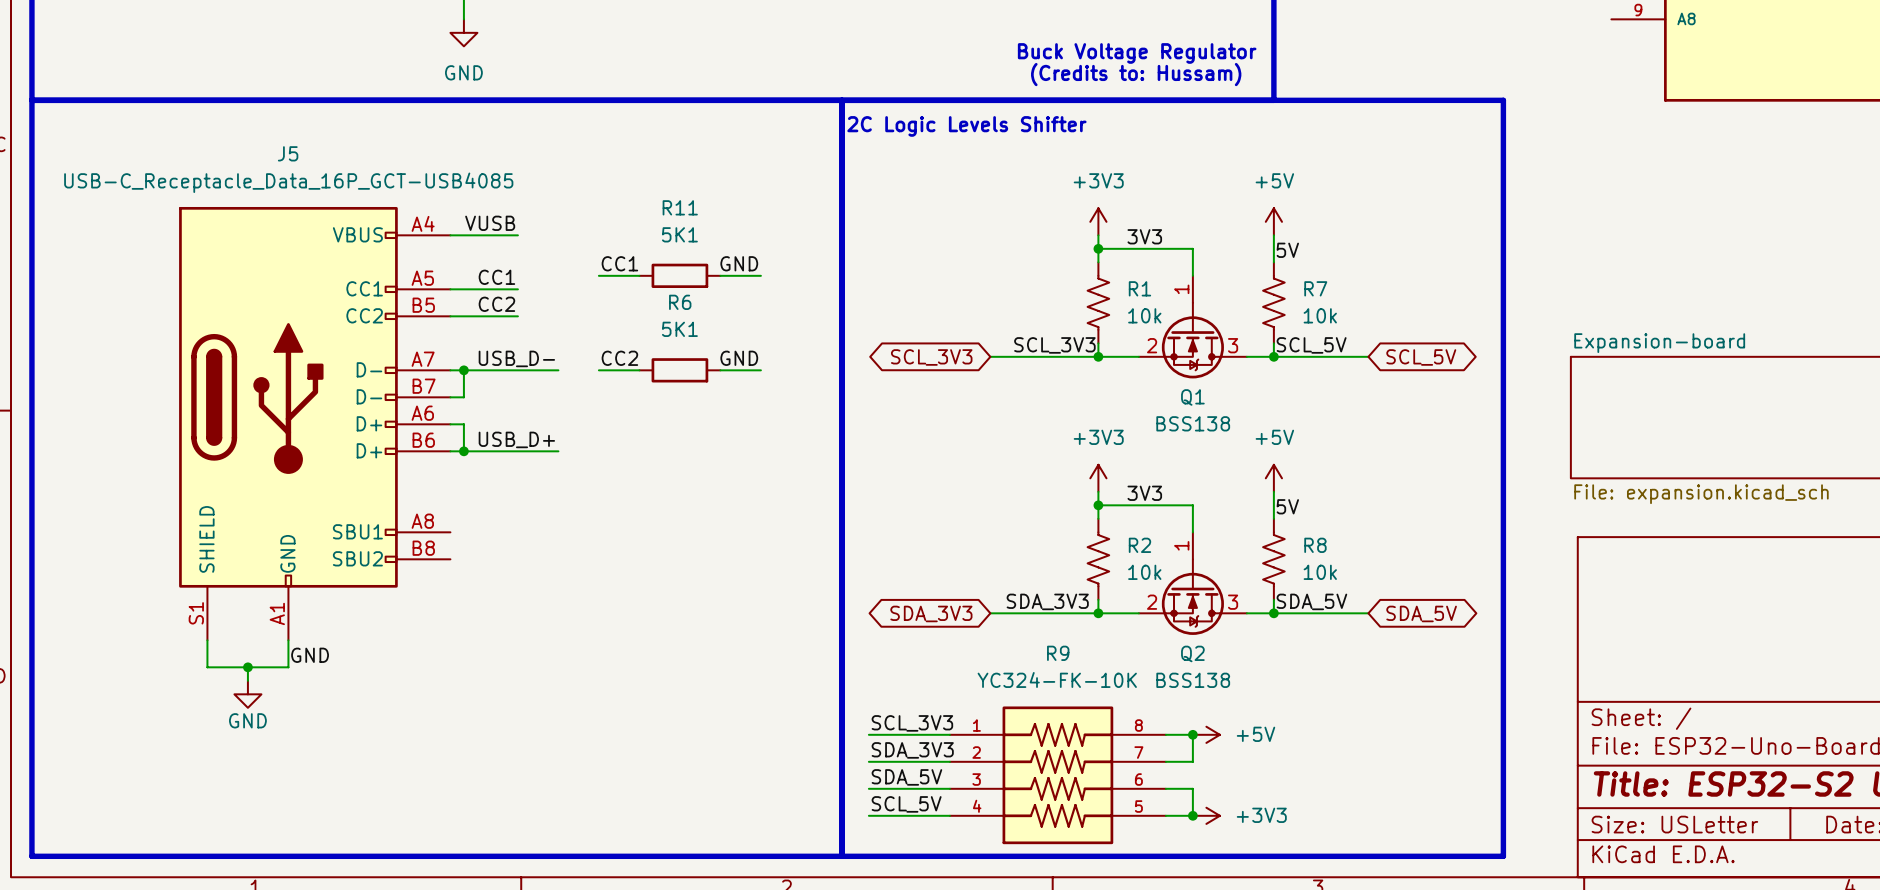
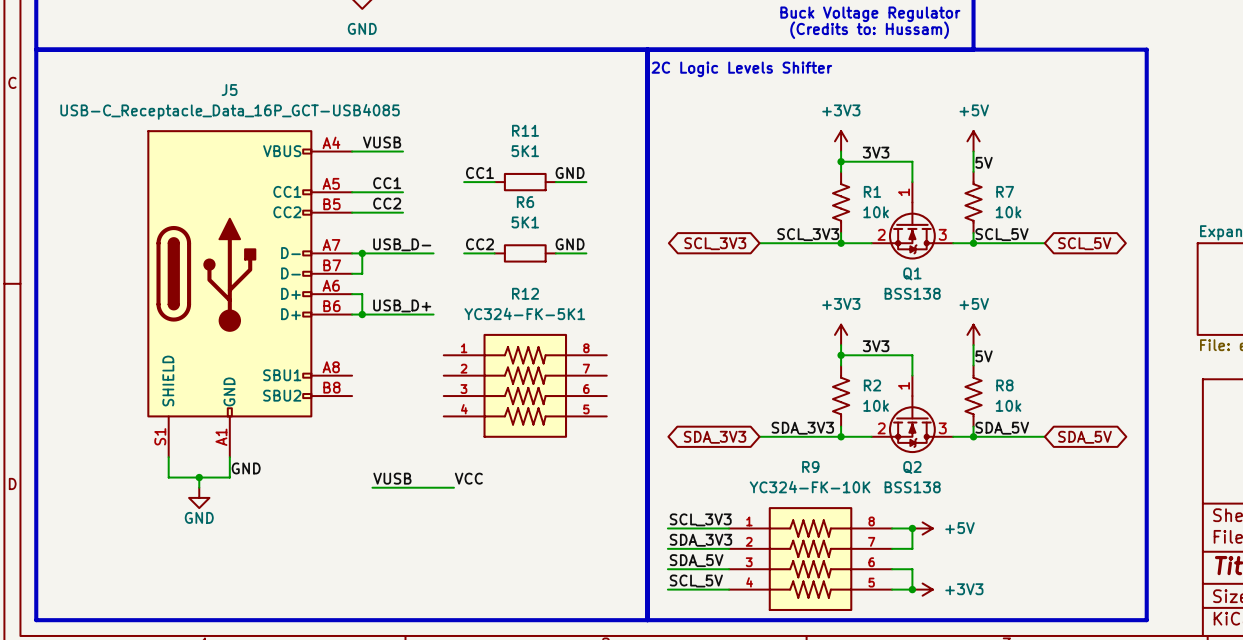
R12: none -> YC324-FK-5K1 (525, 385)
label: none -> VUSB (392, 478)
label: none -> VCC (468, 478)
wire: none -> (372, 487) (453, 487)

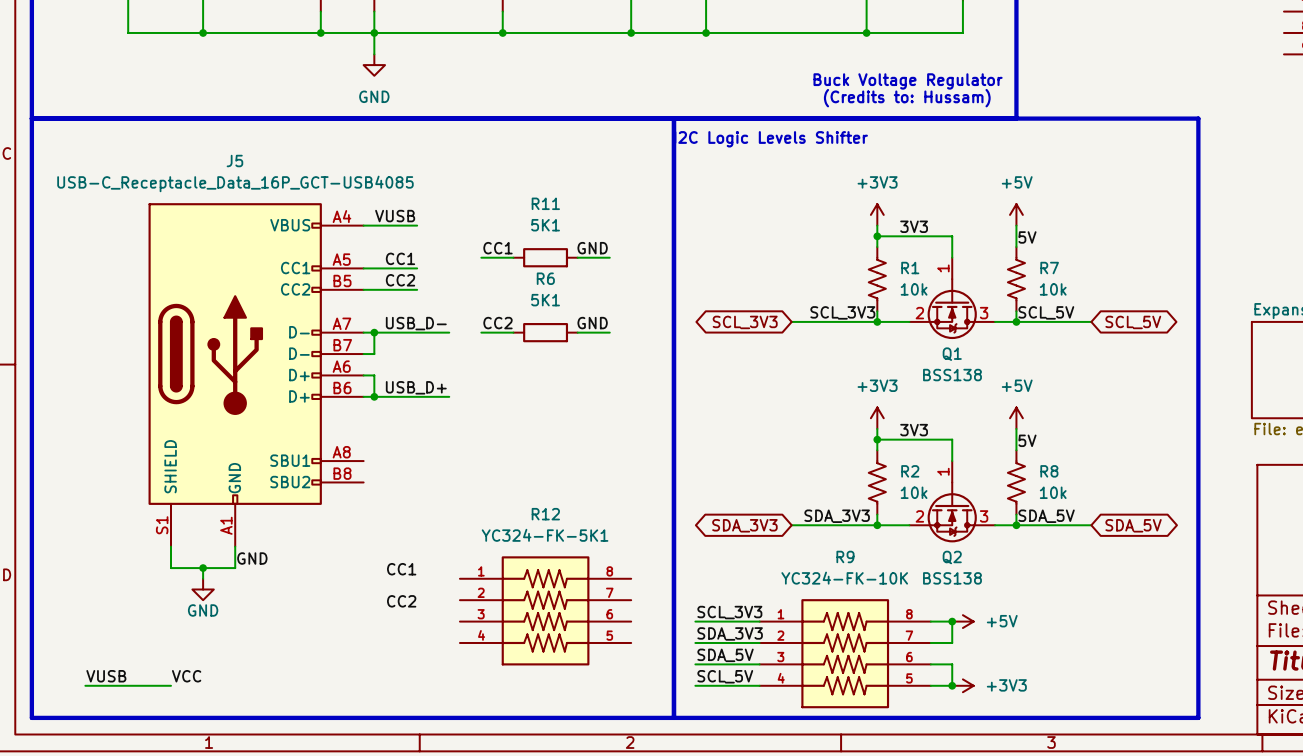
R12 position: (525, 385) -> (545, 610)
label: VUSB (392, 478) -> CC1 (401, 569)
label: VCC (468, 478) -> none
wire: (372, 487) (453, 487) -> none
label: none -> CC2 (401, 601)
label: none -> VUSB (106, 676)
label: none -> VCC (186, 676)
wire: none -> (85, 685) (171, 685)

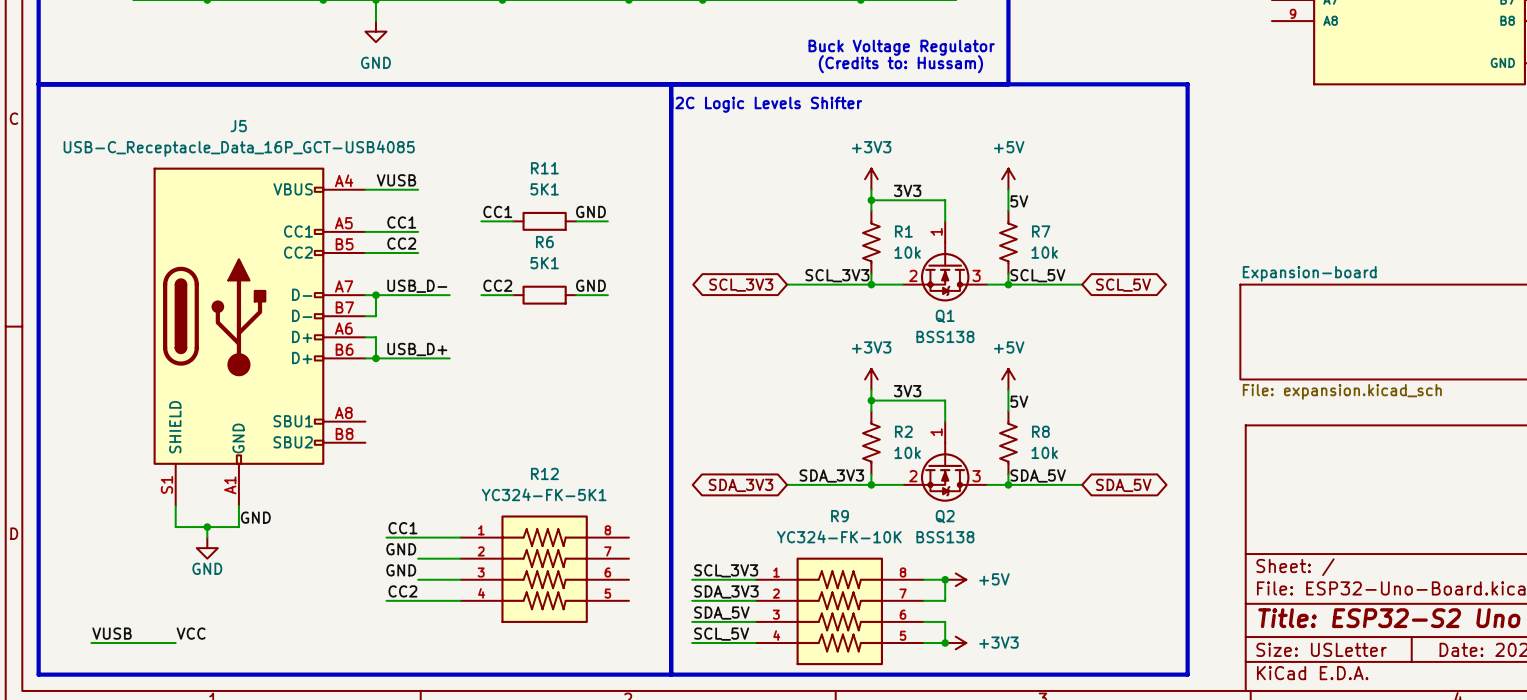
wire: none -> (386, 537) (460, 537)
label: none -> GND (401, 549)
wire: none -> (418, 558) (460, 558)
label position: CC2 (401, 601) -> CC2 (402, 591)
label: none -> GND (401, 570)
wire: none -> (418, 579) (460, 579)
wire: none -> (386, 600) (460, 600)

